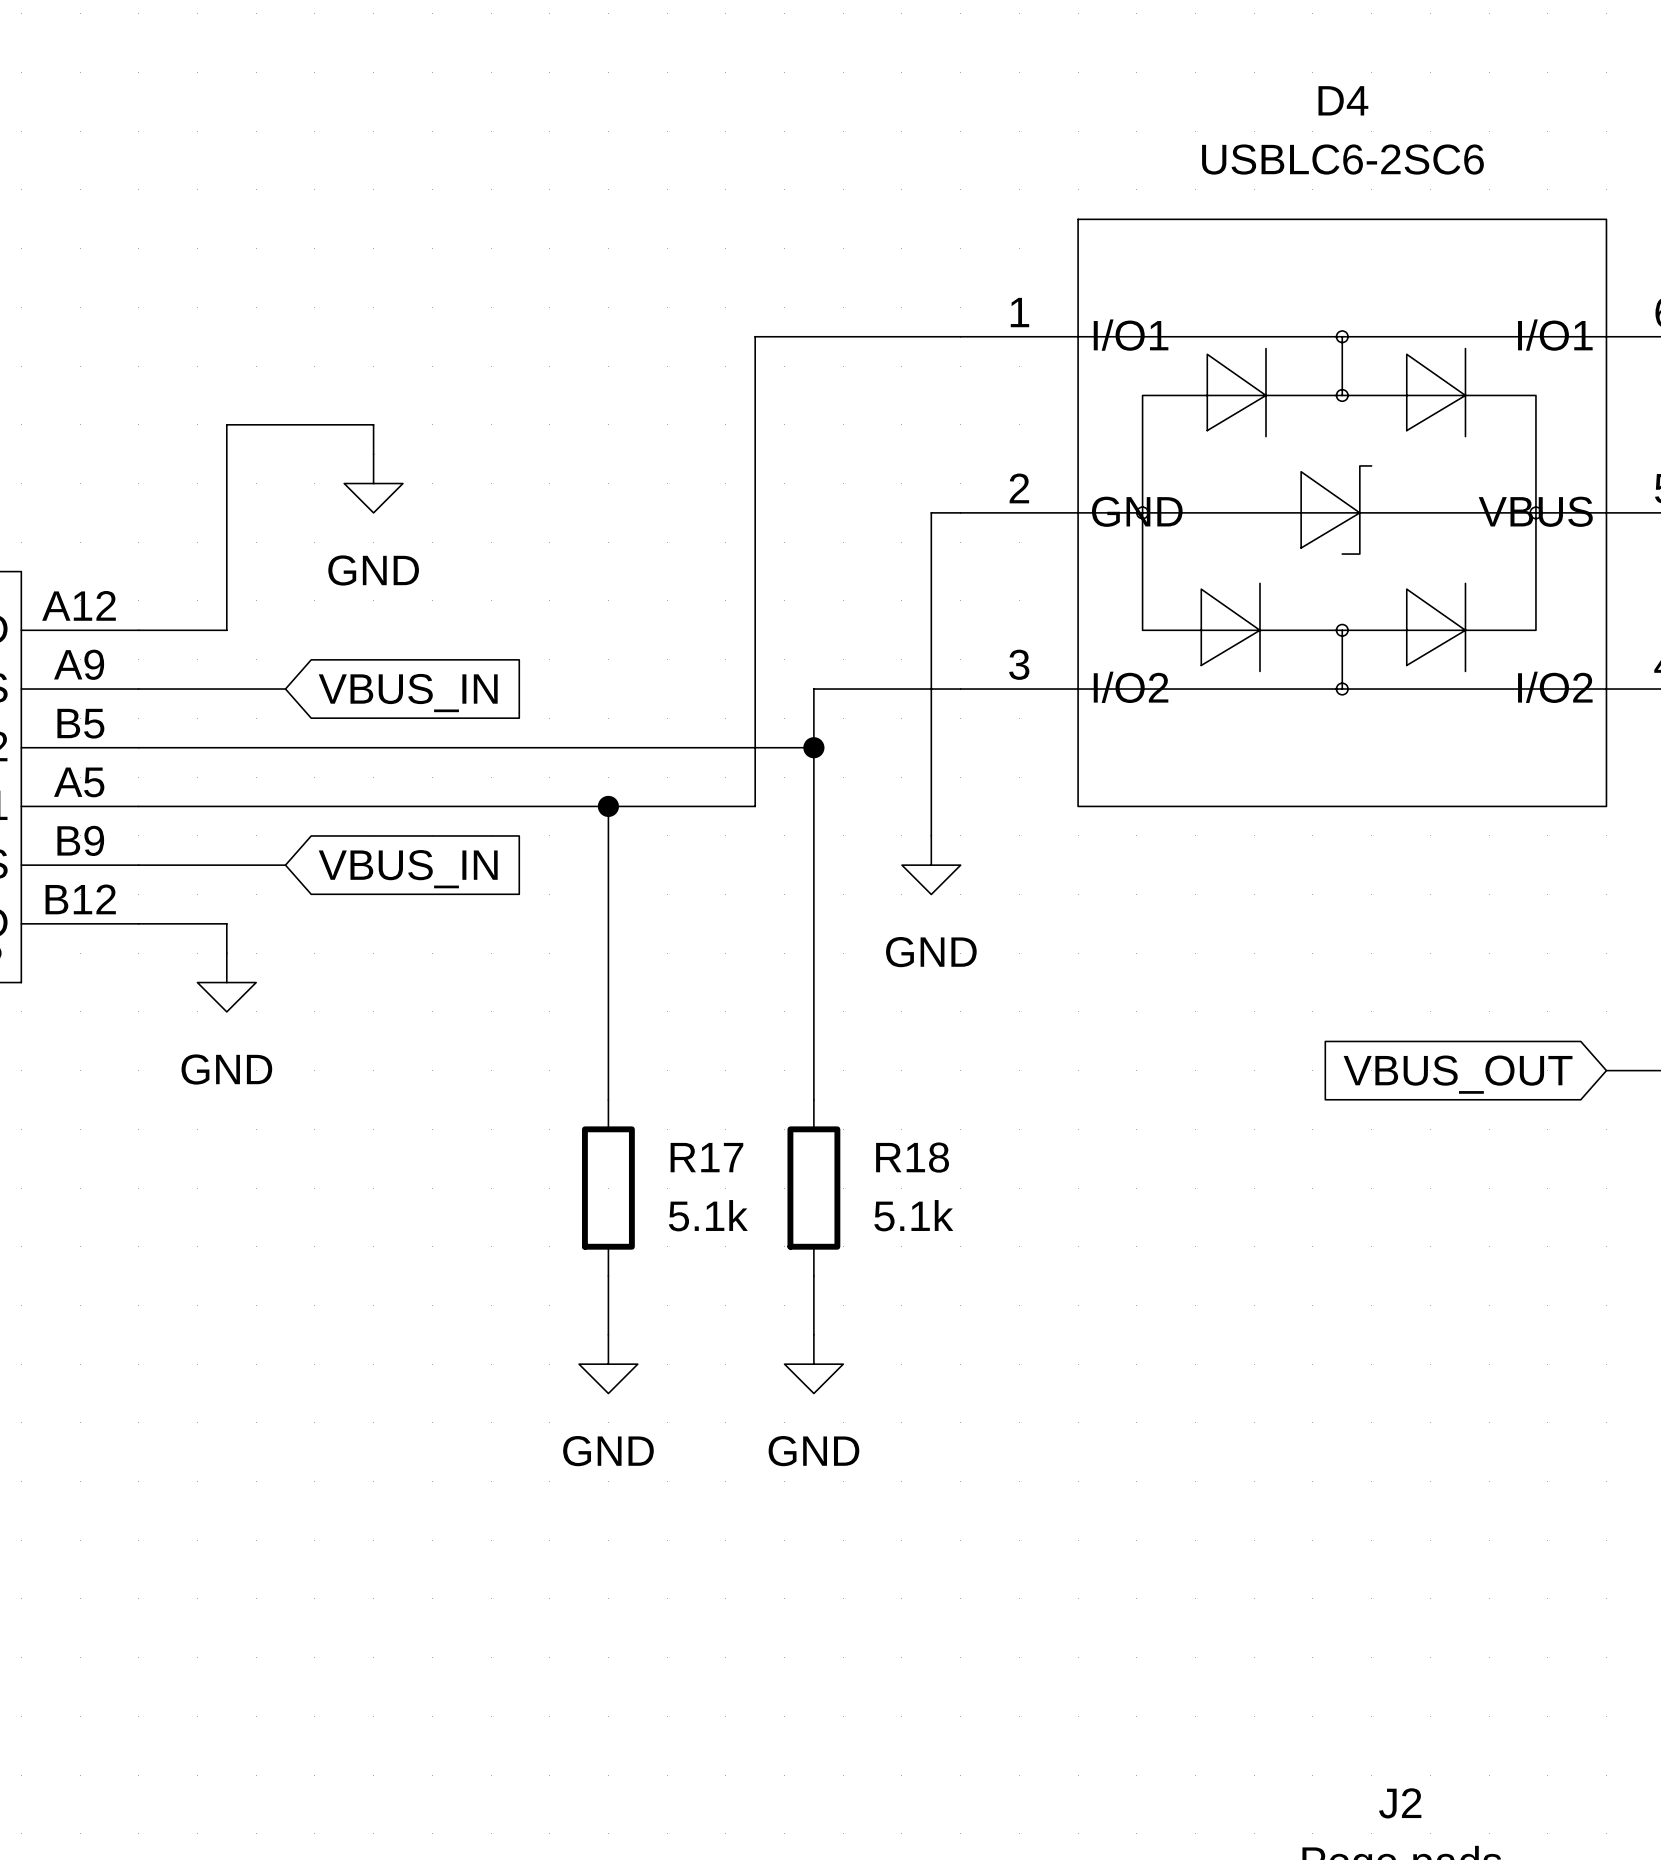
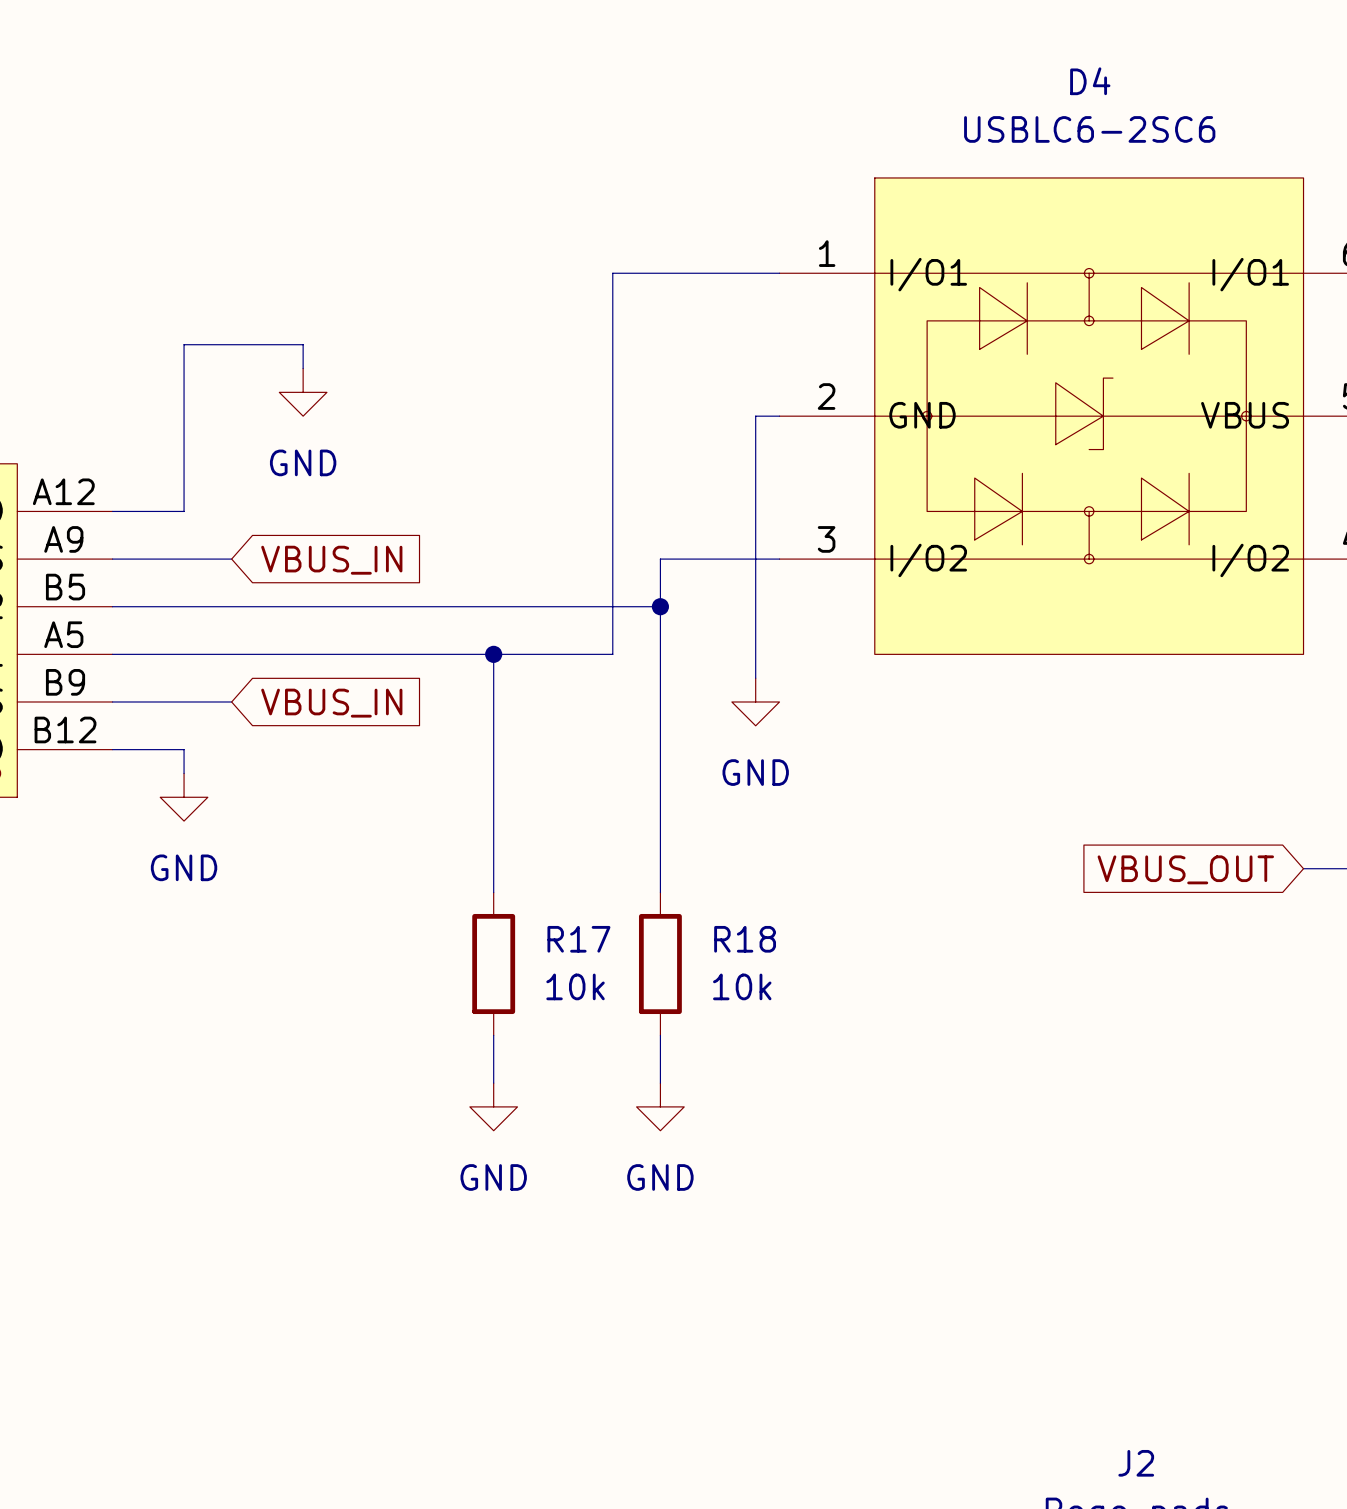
R17 value: 5.1k (708, 1215) -> 10k (575, 986)
R18 value: 5.1k (913, 1215) -> 10k (742, 986)

